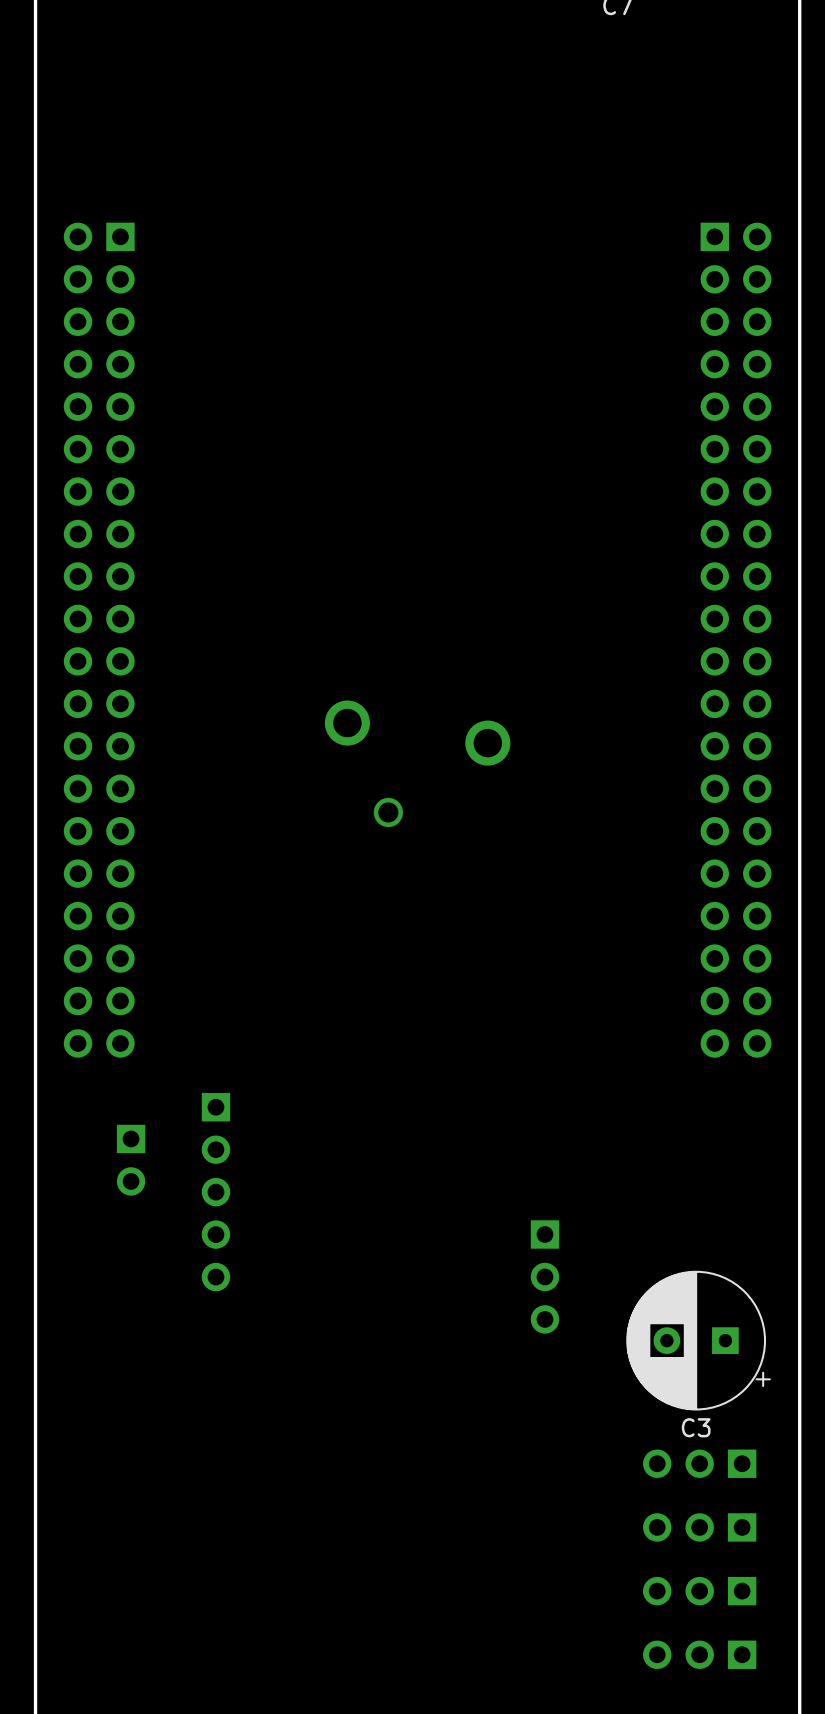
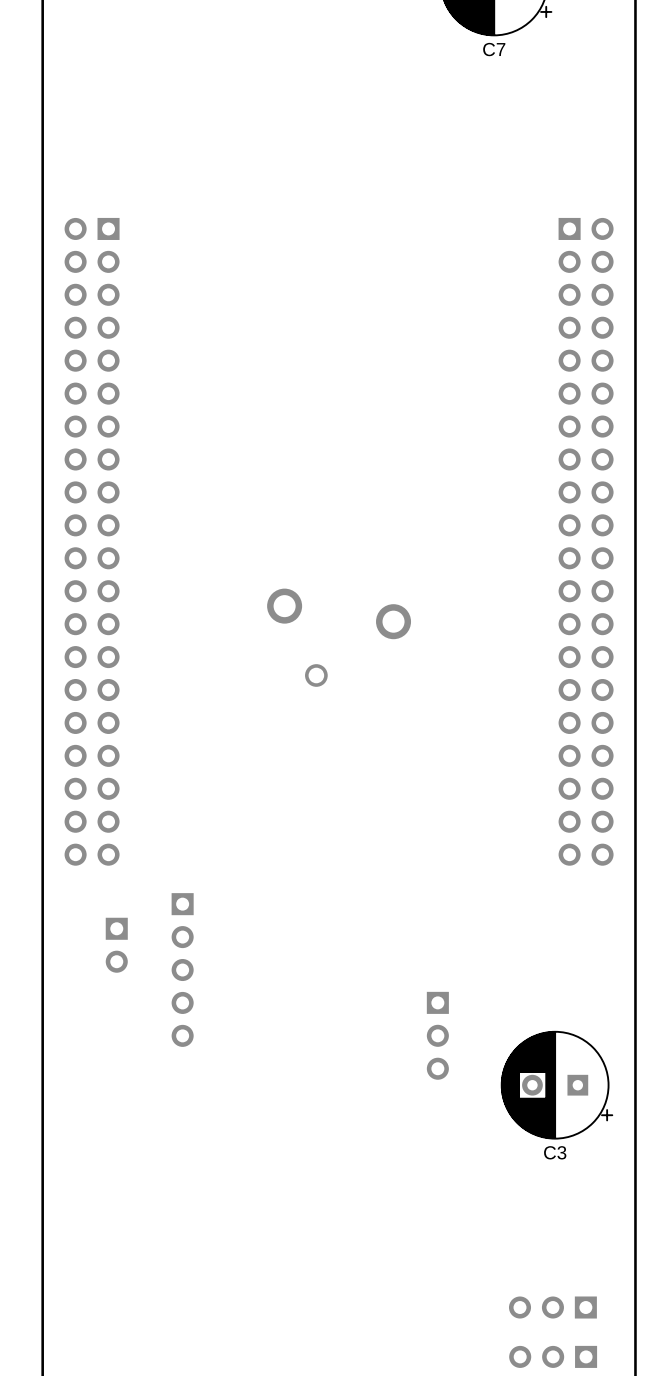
part: (699, 1463) -> none
part: (699, 1527) -> none
part: (699, 1591) -> none
part: none -> (552, 1307)
part: (699, 1654) -> none
part: none -> (553, 1356)

